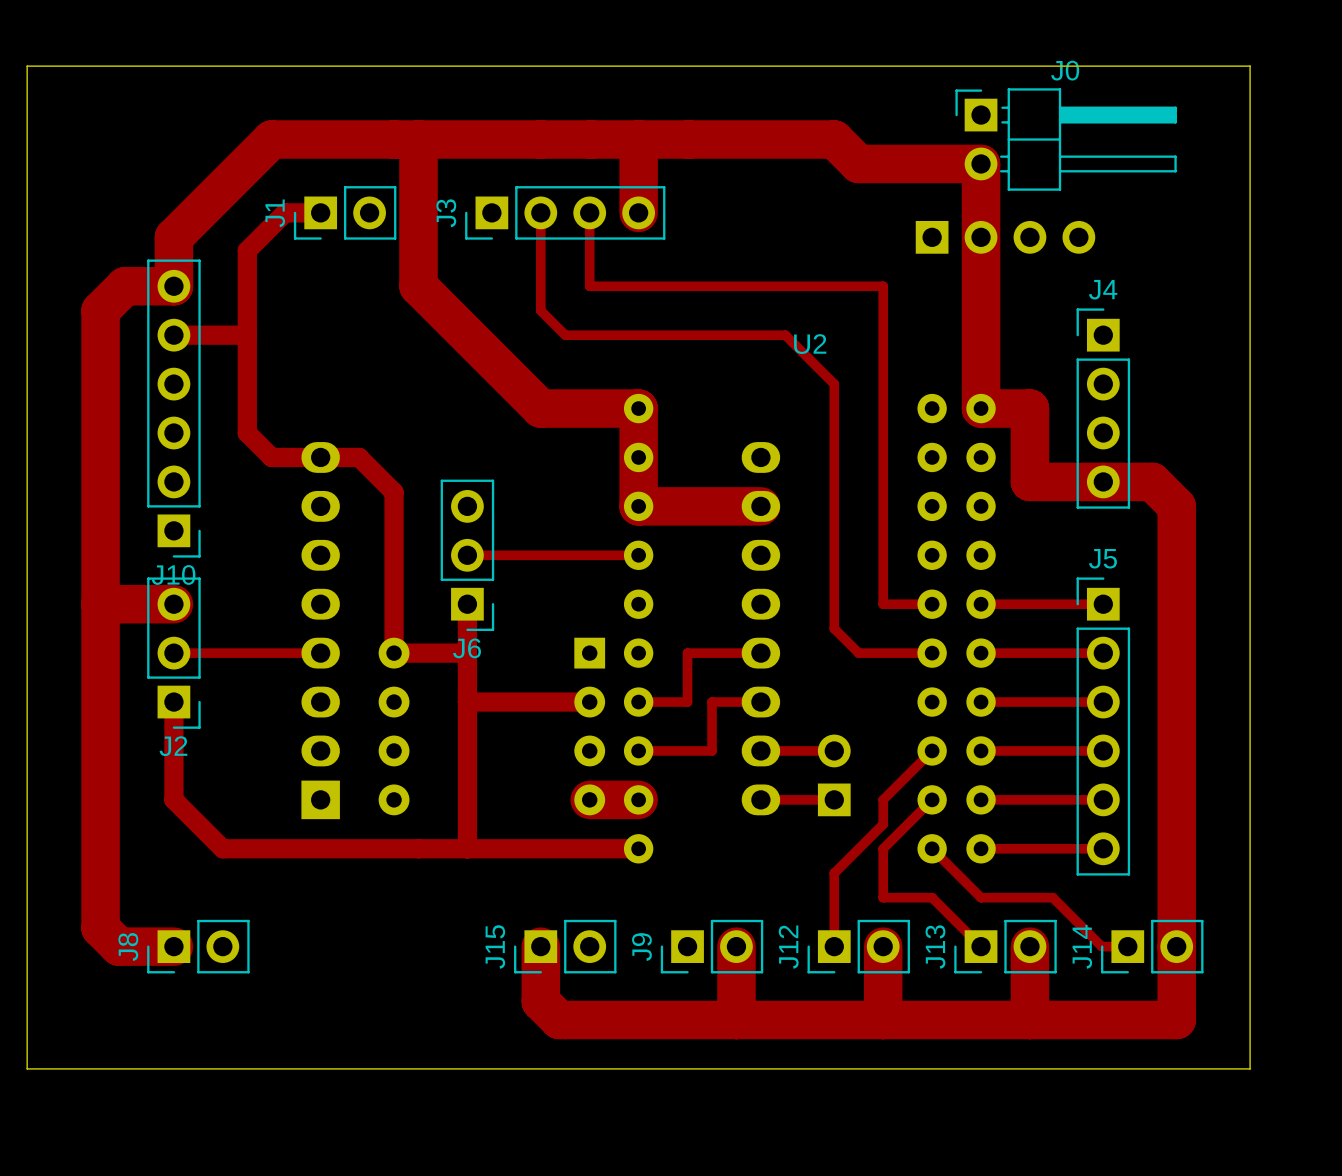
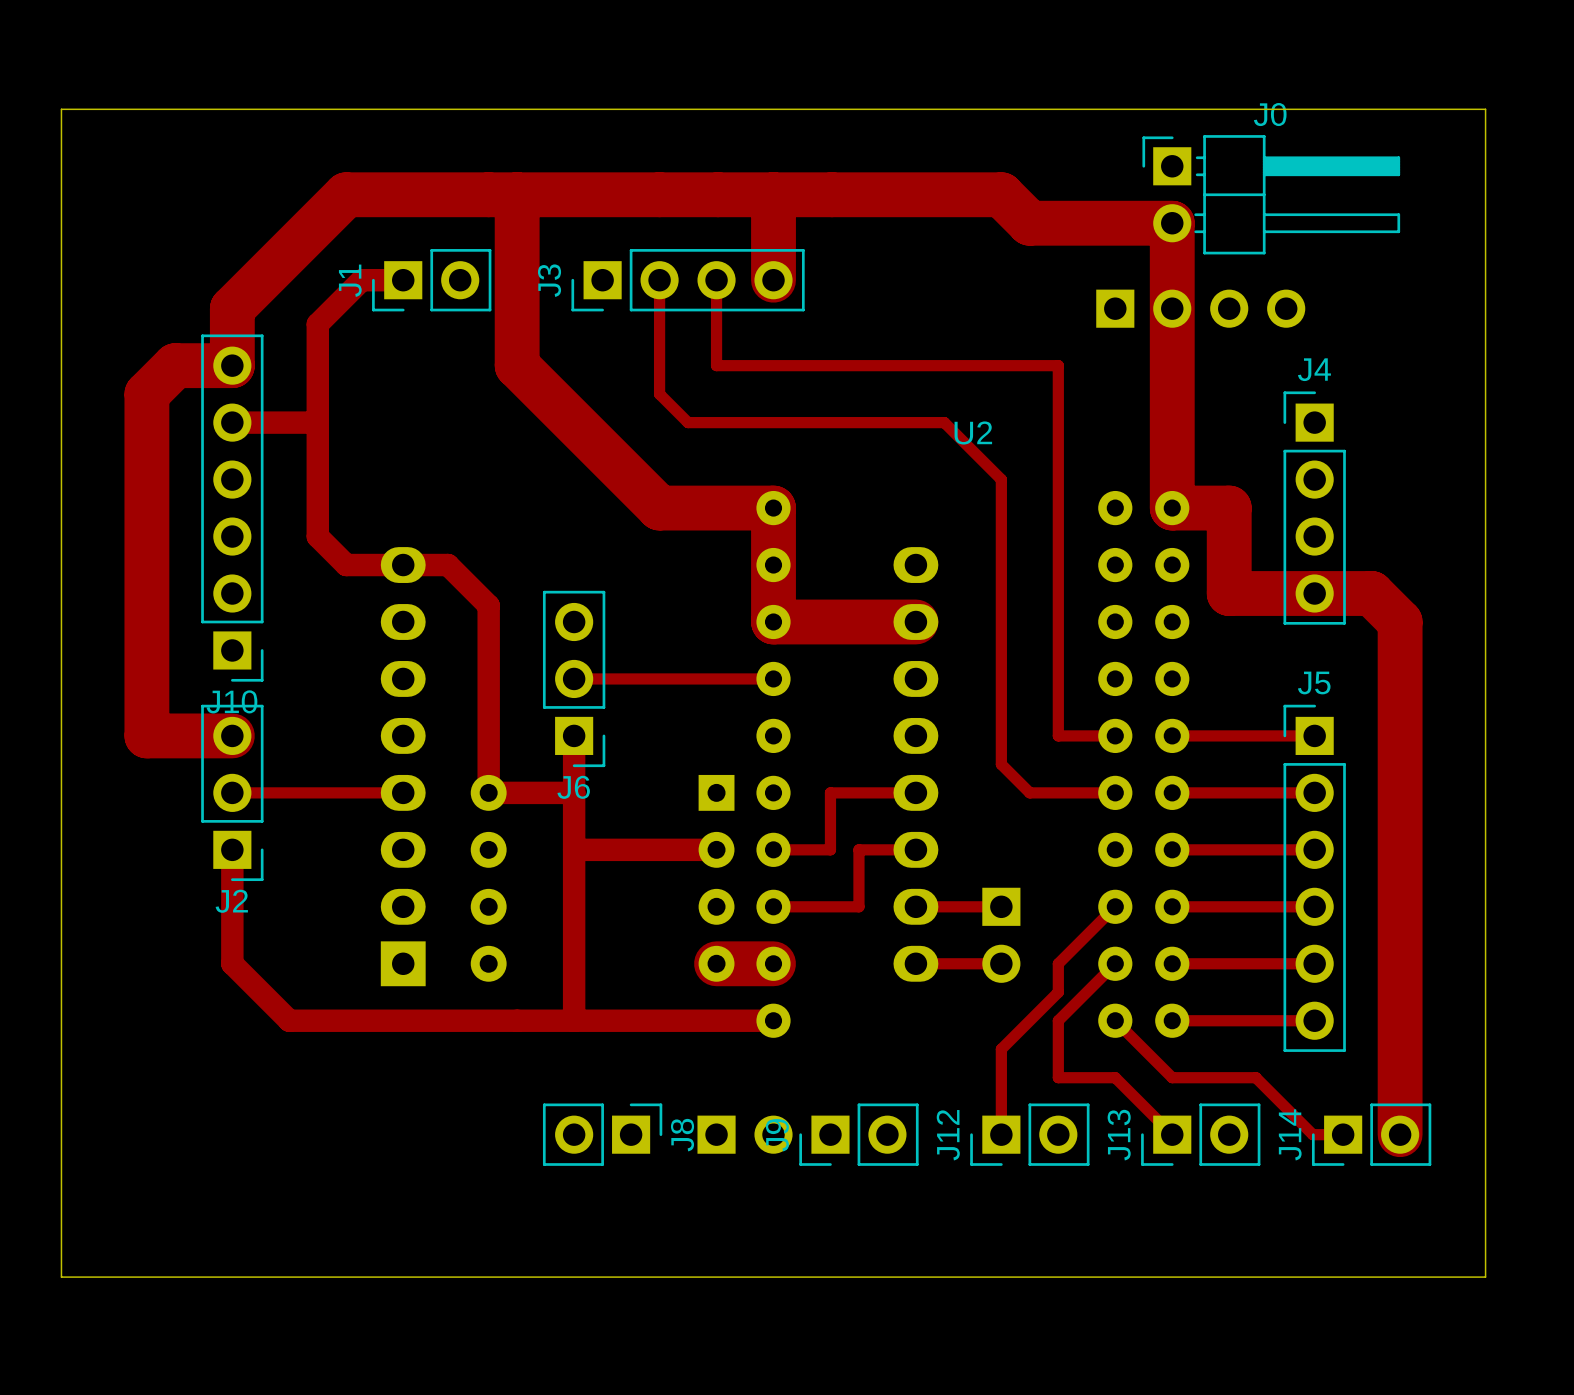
track: (100, 604) (100, 928) (119, 946) (173, 946) -> none
part rotation: 0° (834, 775) -> 180° (1001, 935)
J8 rotation: 0° (198, 946) -> 180° (602, 1134)
J8 position: (198, 946) -> (602, 1134)
track: (540, 946) (540, 1001) (559, 1020) (1176, 1020) (1176, 946) -> none
J15 side: top (565, 946) -> bottom (745, 1134)
track: (736, 946) (736, 1020) -> none
track: (883, 946) (883, 1020) -> none
track: (1029, 946) (1029, 1020) -> none

